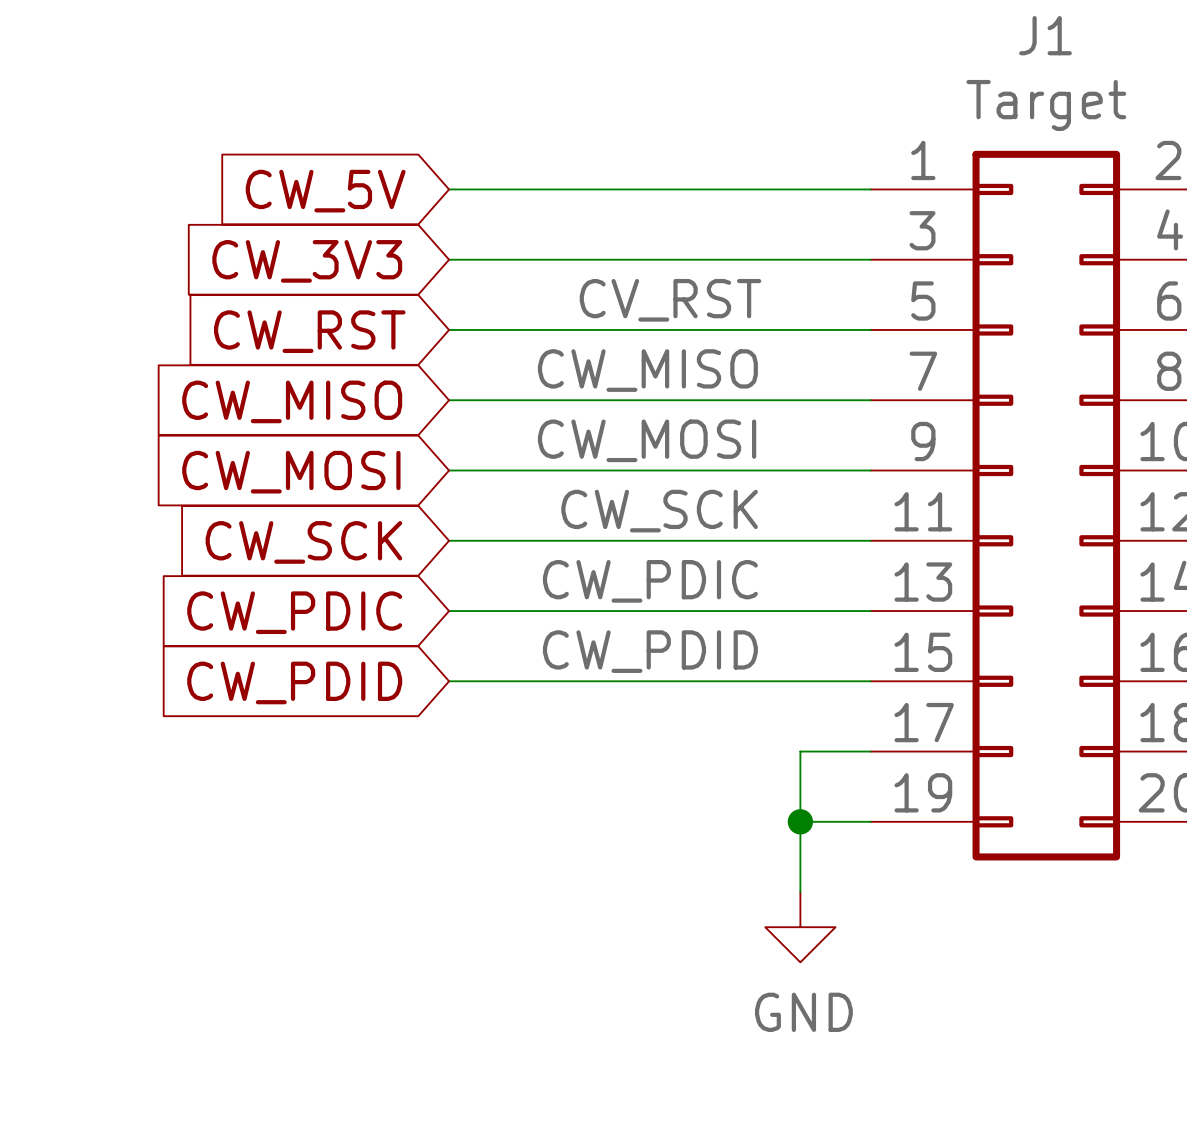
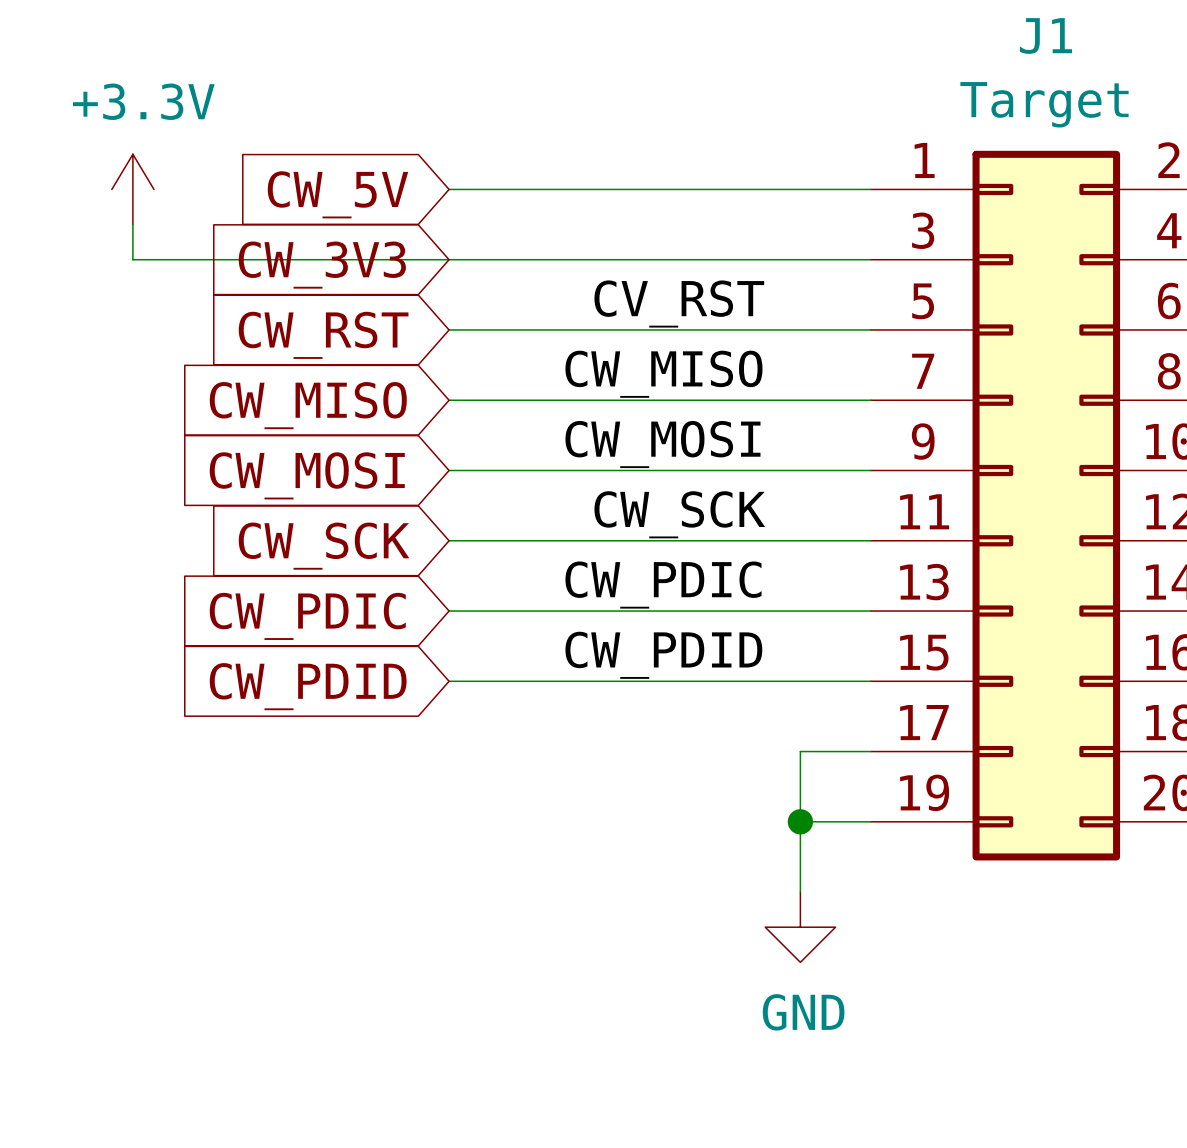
power symbol: none -> +3.3V (132, 189)
wire: none -> (132, 224) (132, 259) (449, 259)

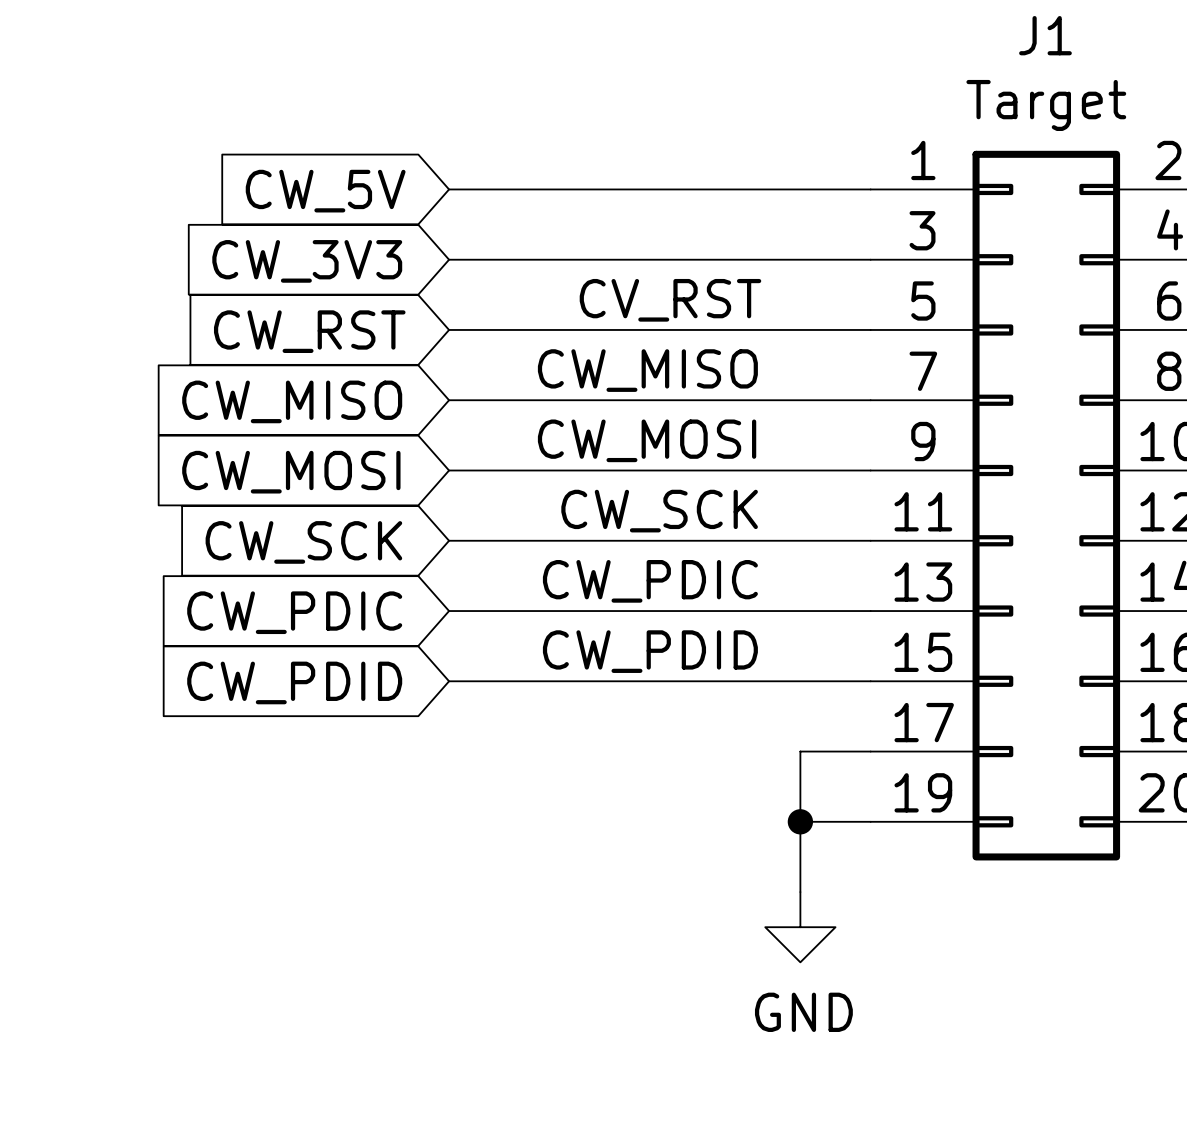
power symbol: +3.3V (132, 189) -> none
wire: (132, 224) (132, 259) (449, 259) -> none

